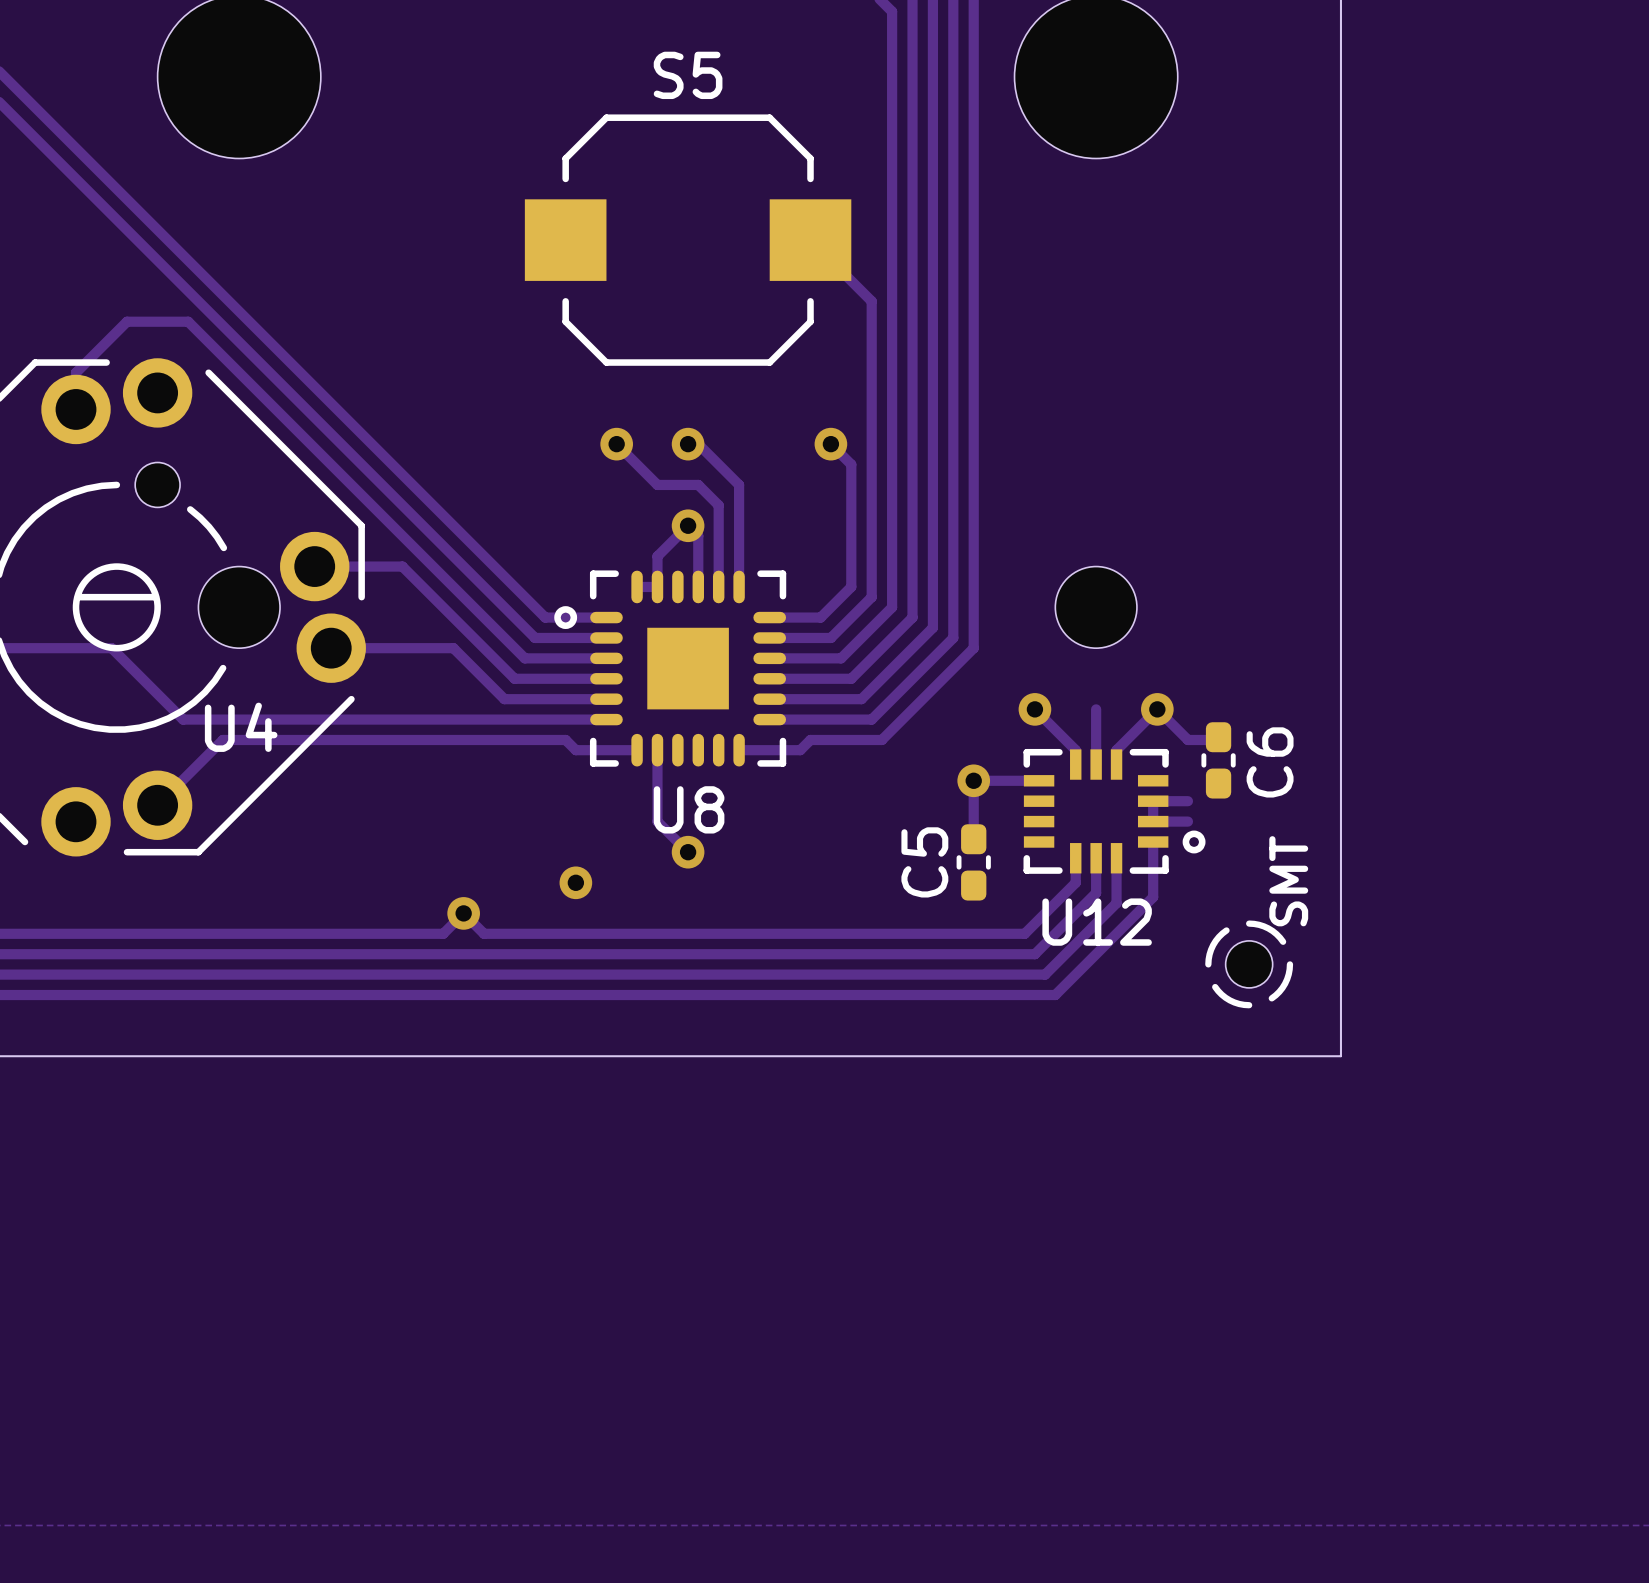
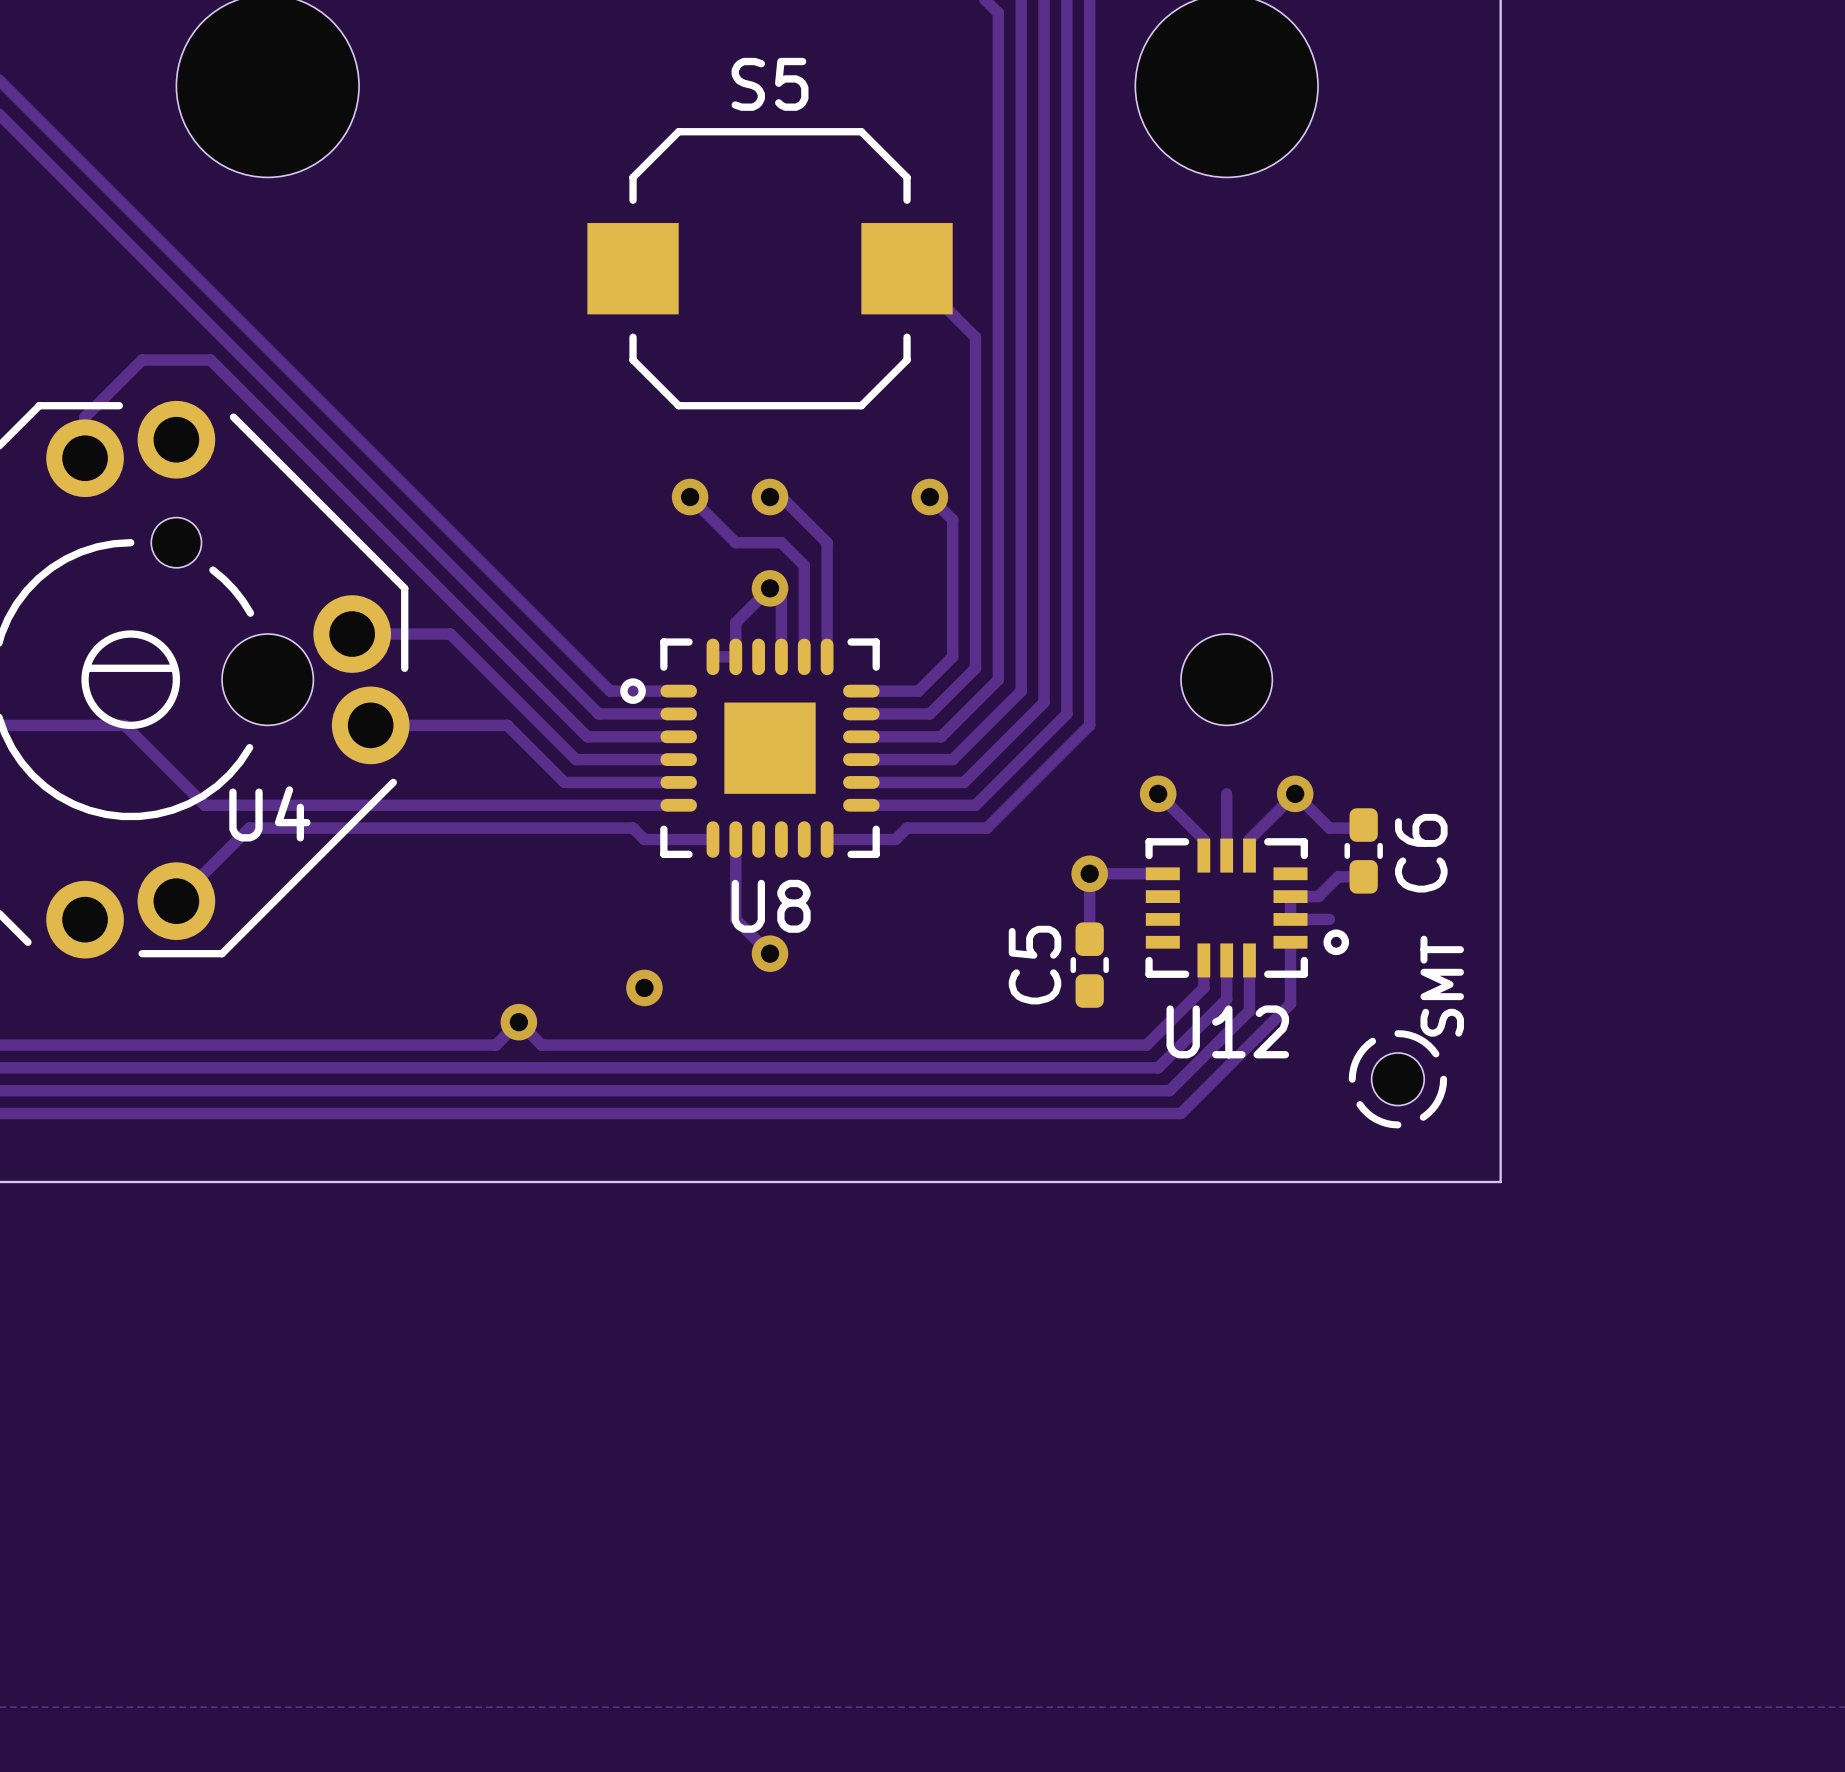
track: (1178, 801) (1187, 801) -> (1318, 896) (1338, 876) (1363, 876)

